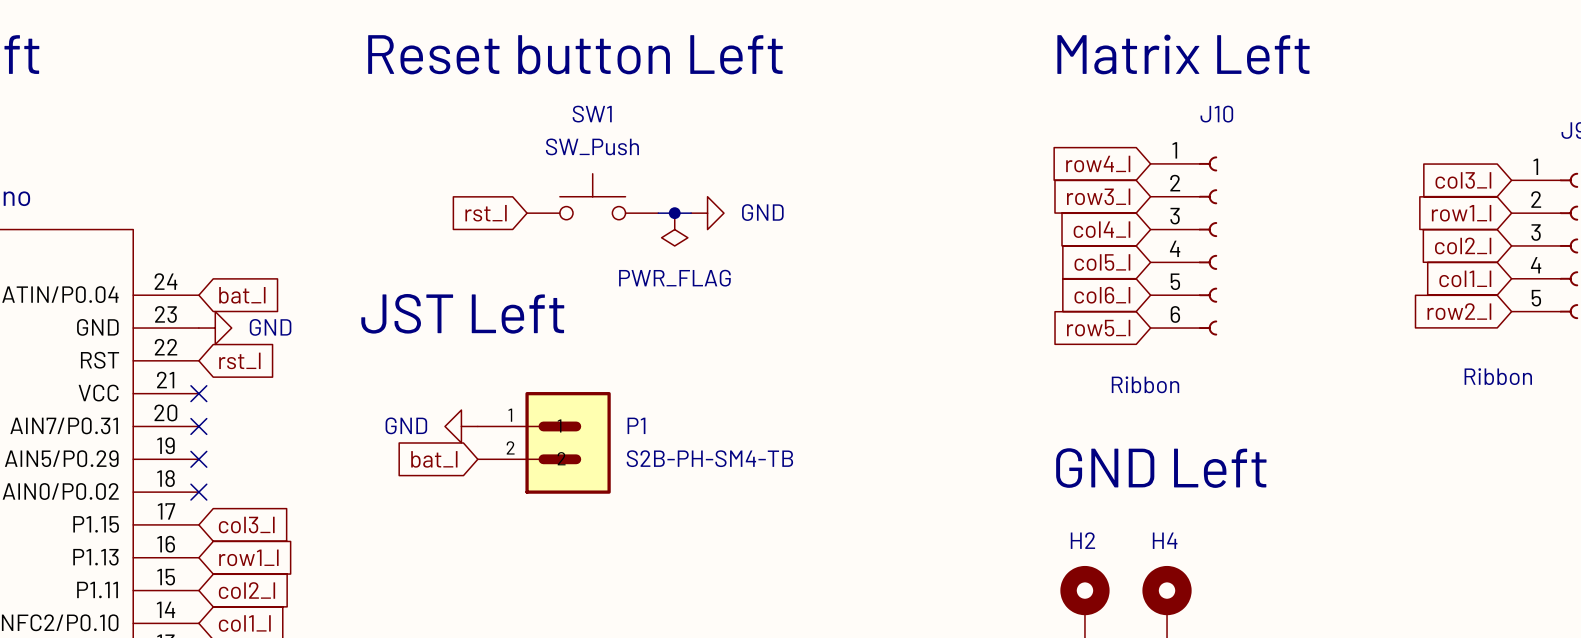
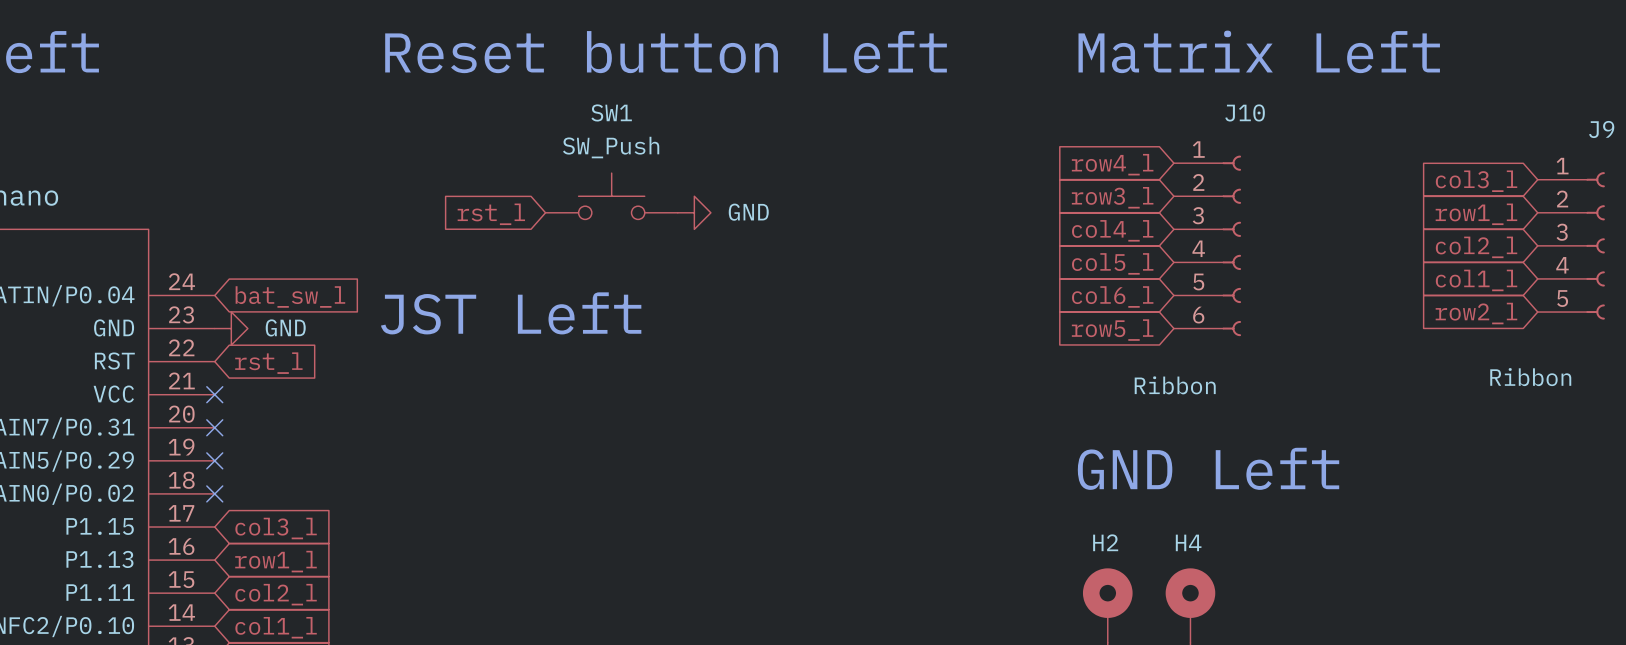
junction: (674, 213) -> none
power symbol position: GND (707, 213) -> GND (694, 212)
power symbol: PWR_FLAG (674, 229) -> none
global label: bat_l (242, 295) -> bat_sw_l (290, 296)
power symbol: GND (461, 426) -> none
P1: S2B-PH-SM4-TB (544, 442) -> none
global label: bat_l (434, 459) -> none

